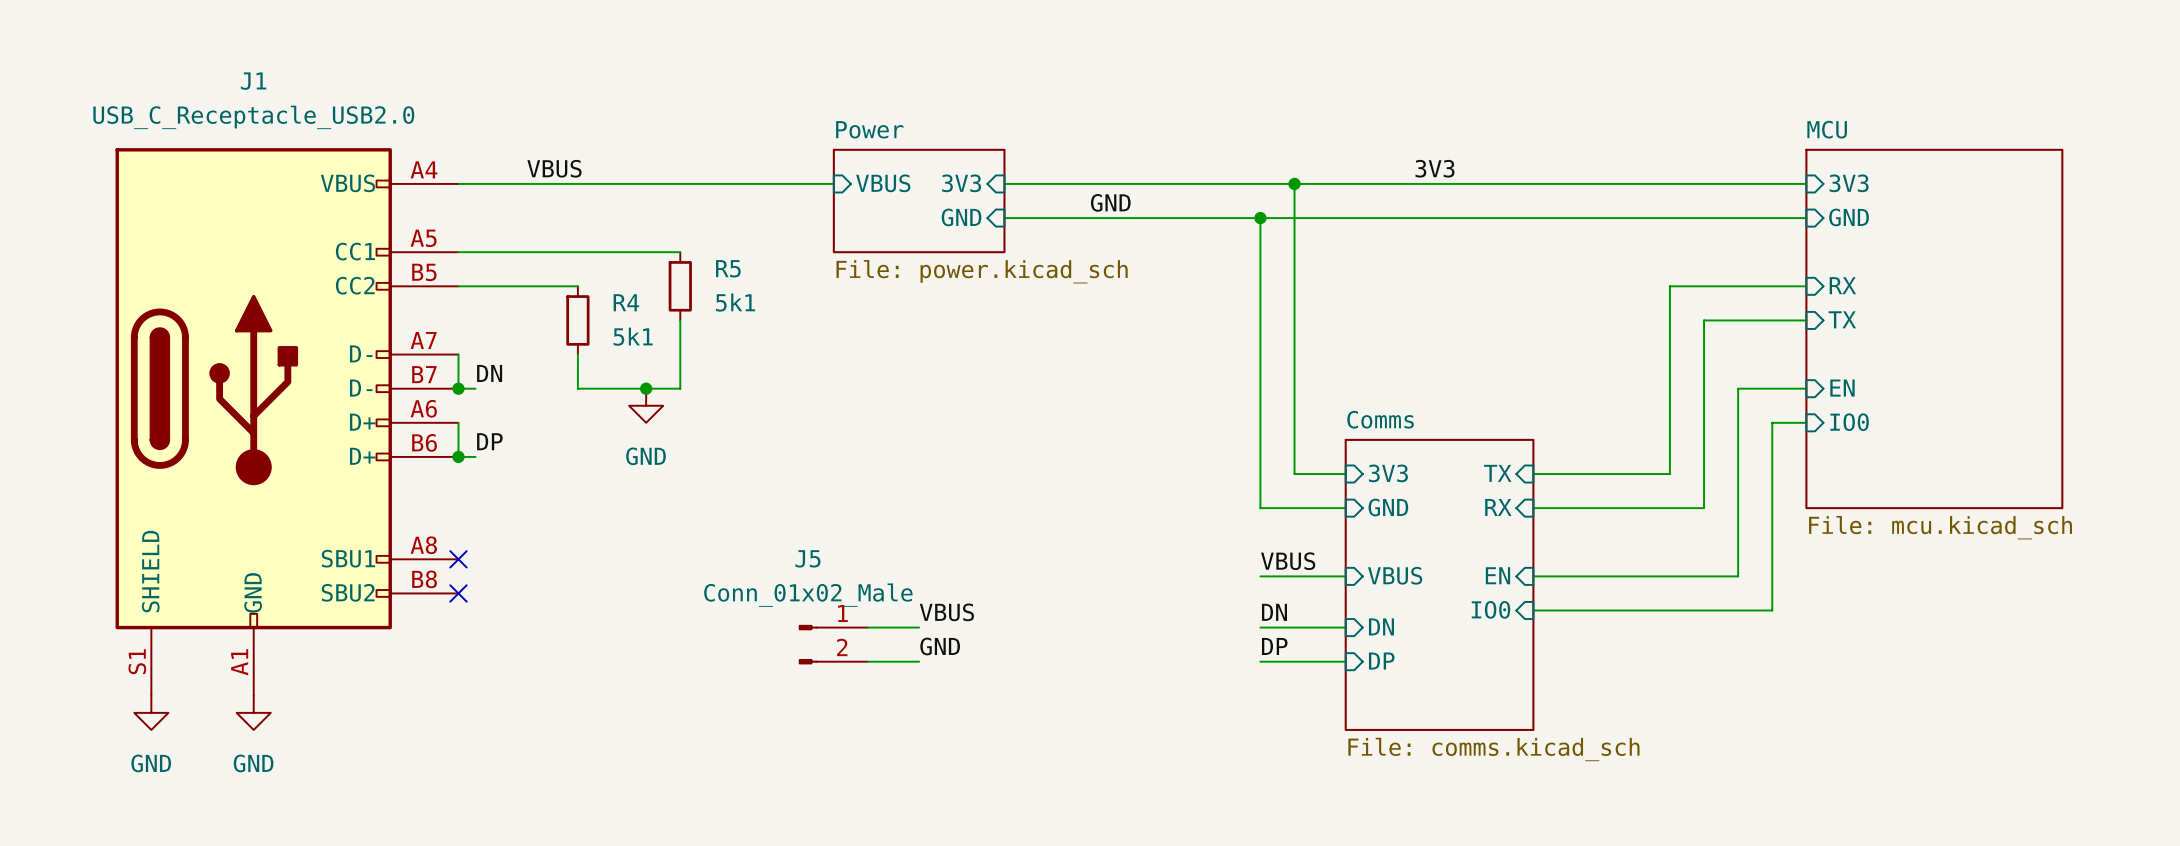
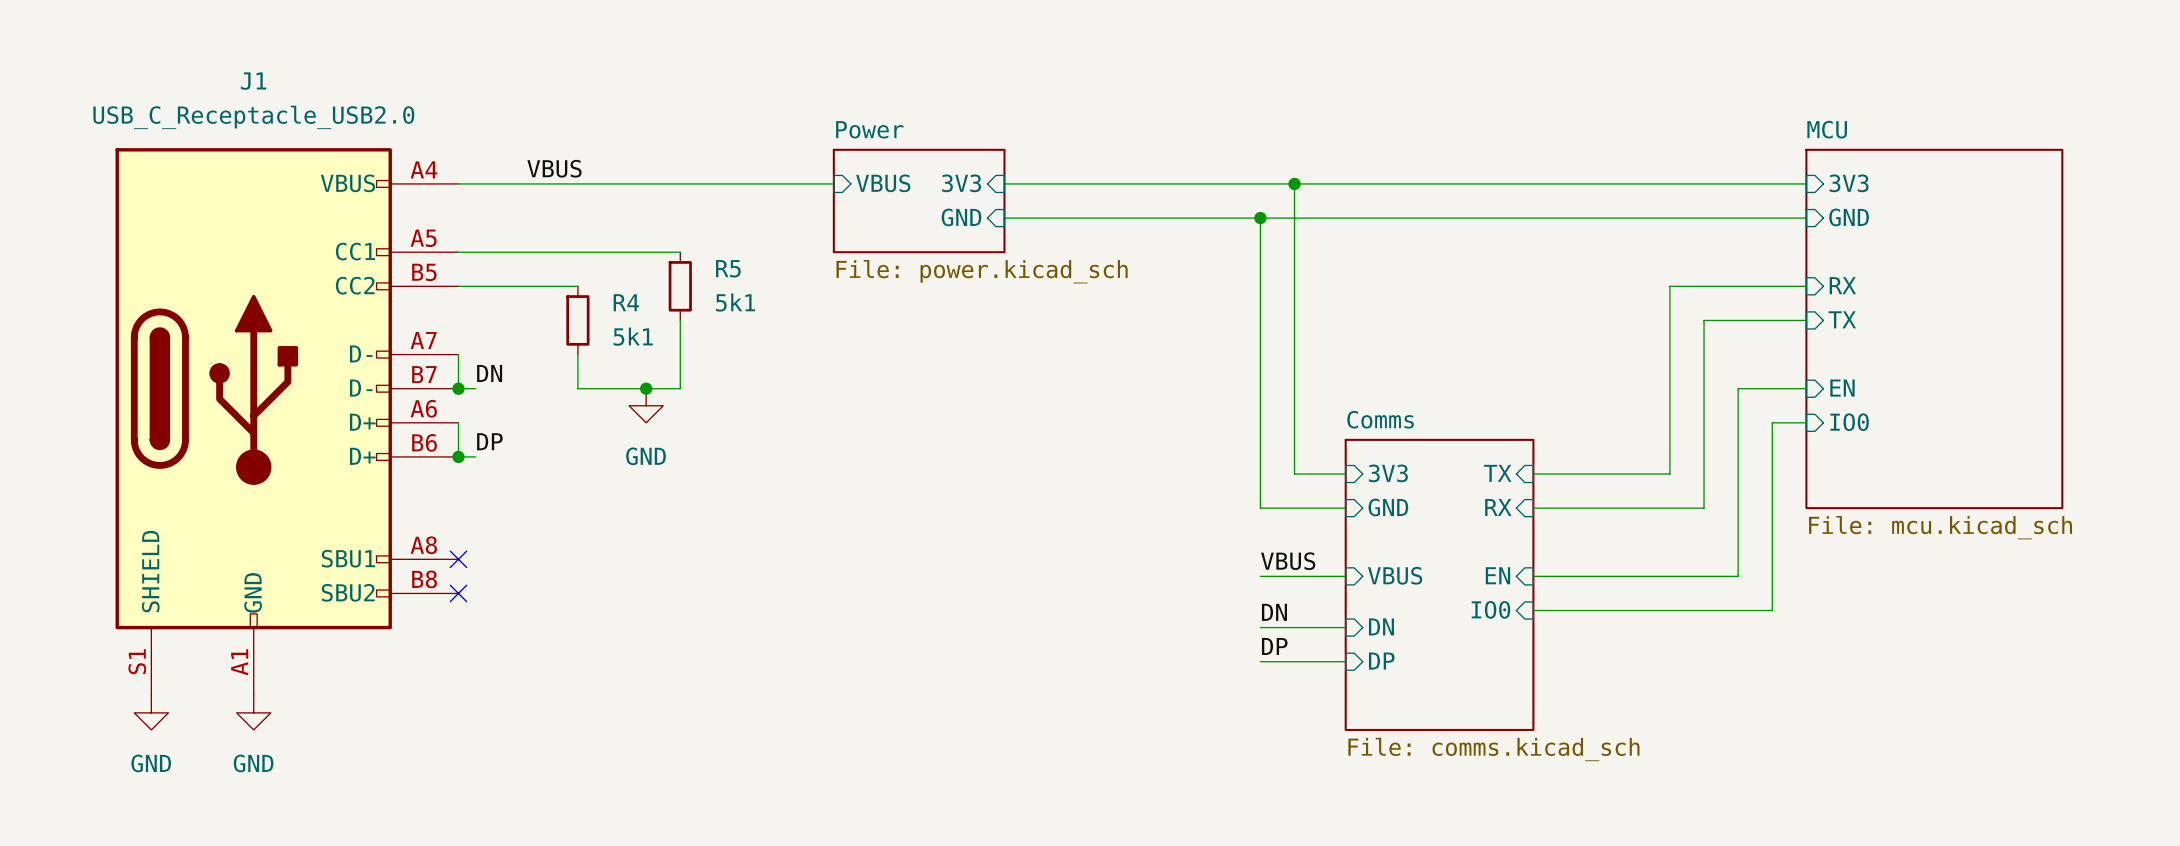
label: 3V3 (1435, 168) -> none
label: GND (1110, 202) -> none
label: VBUS (946, 612) -> none
wire: (867, 627) (919, 627) -> none
J5: Conn_01x02_Male (833, 644) -> none
label: GND (940, 646) -> none
wire: (867, 661) (919, 661) -> none

